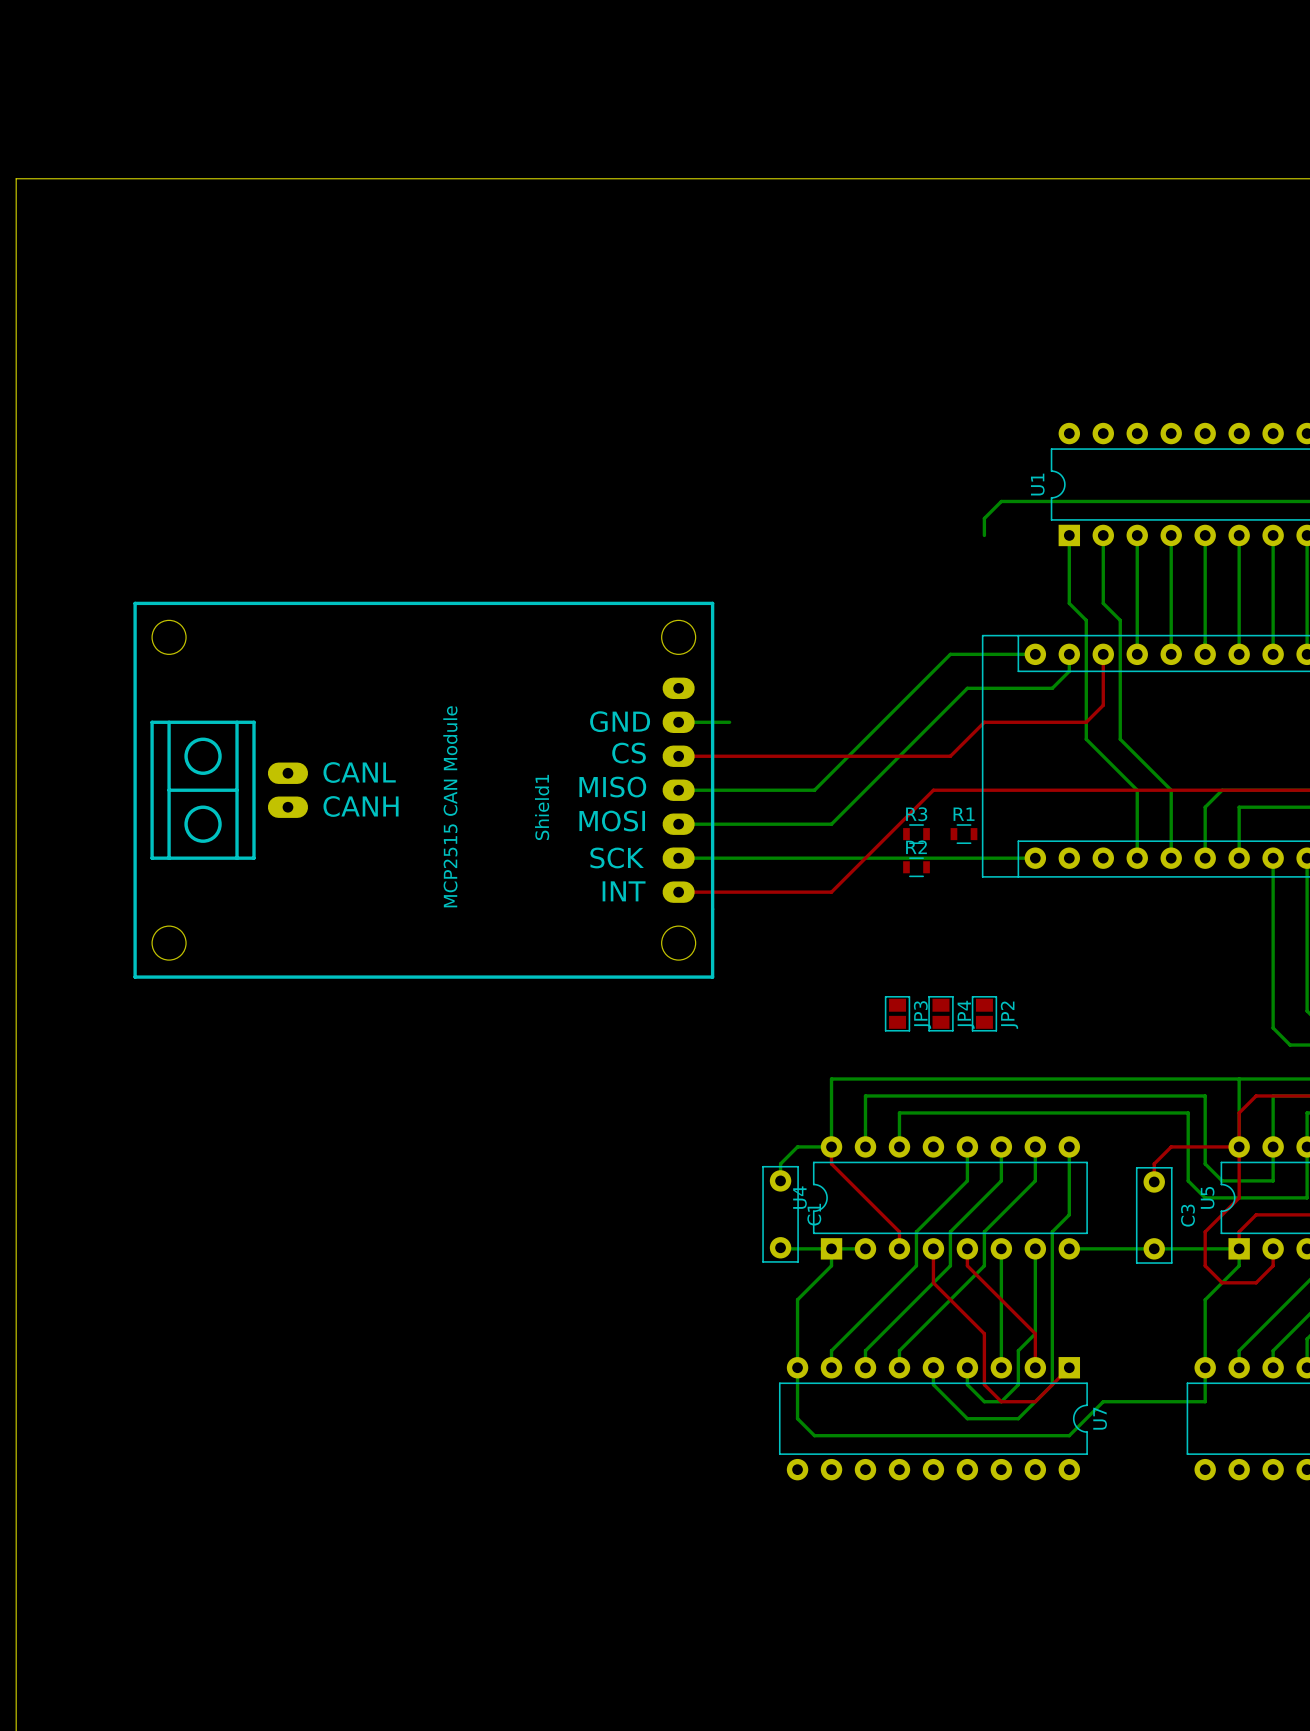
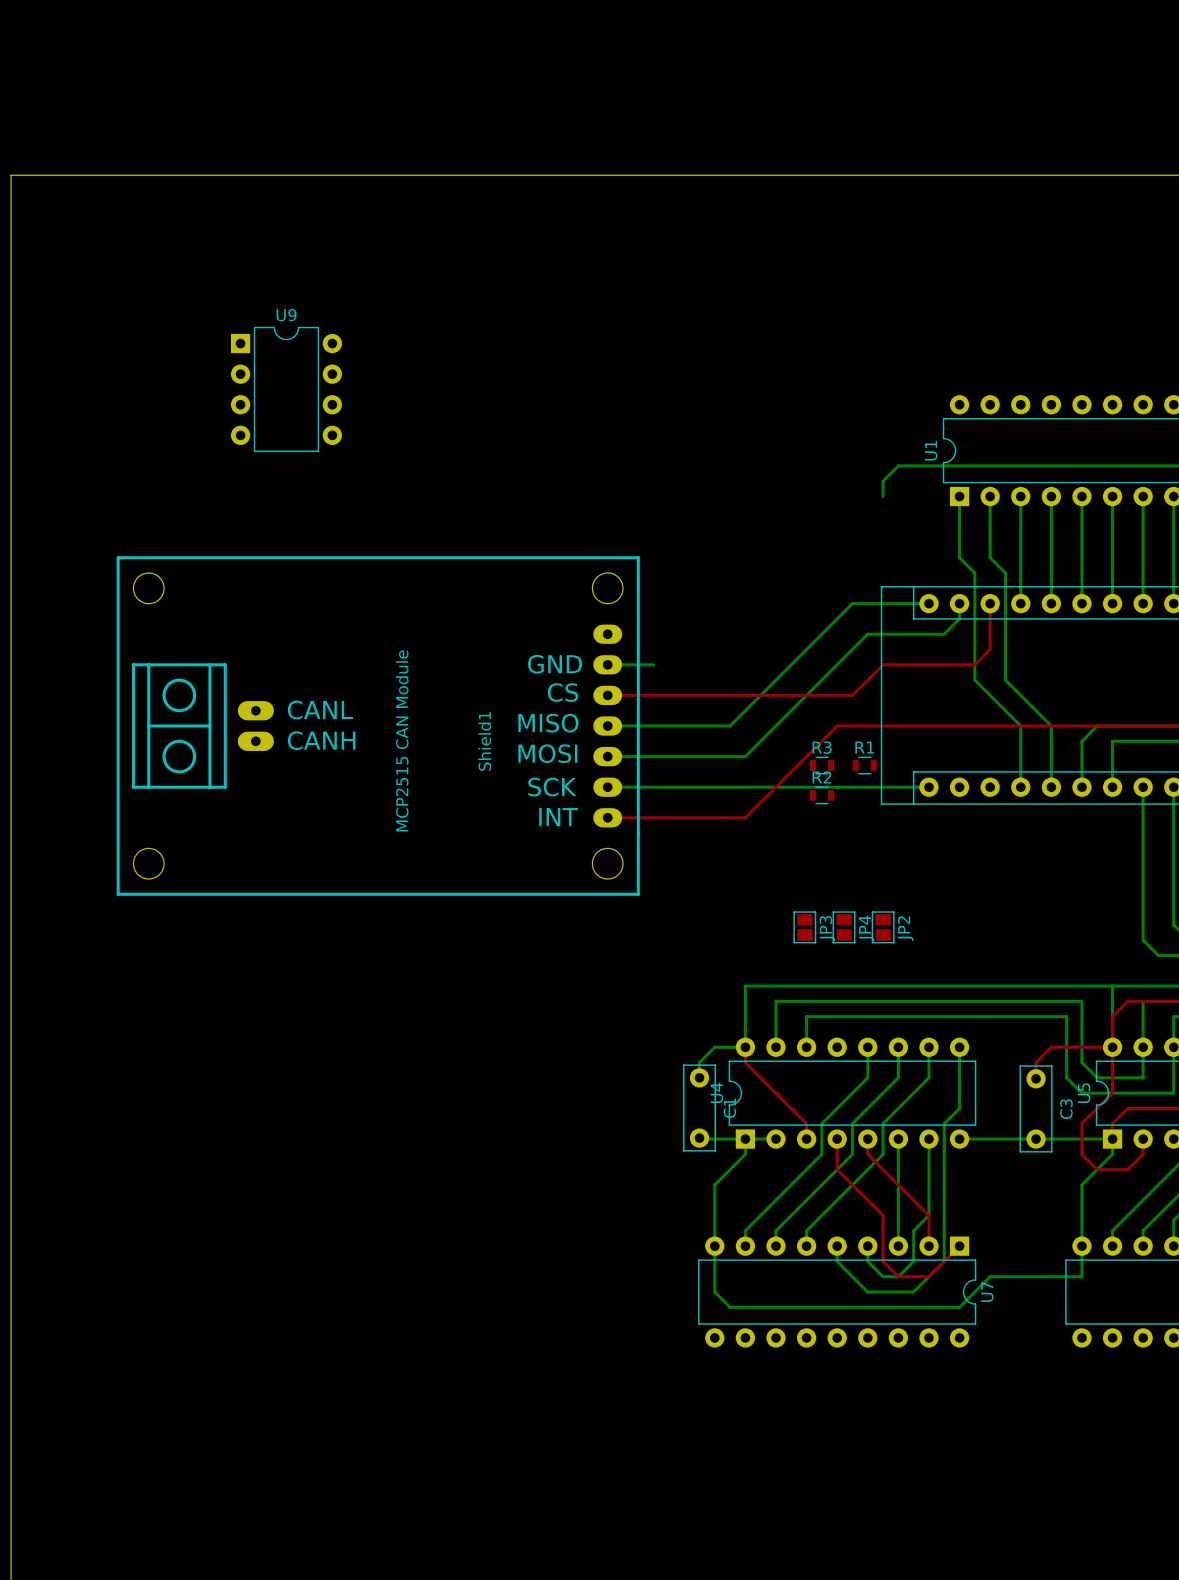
U9: none -> (286, 389)

